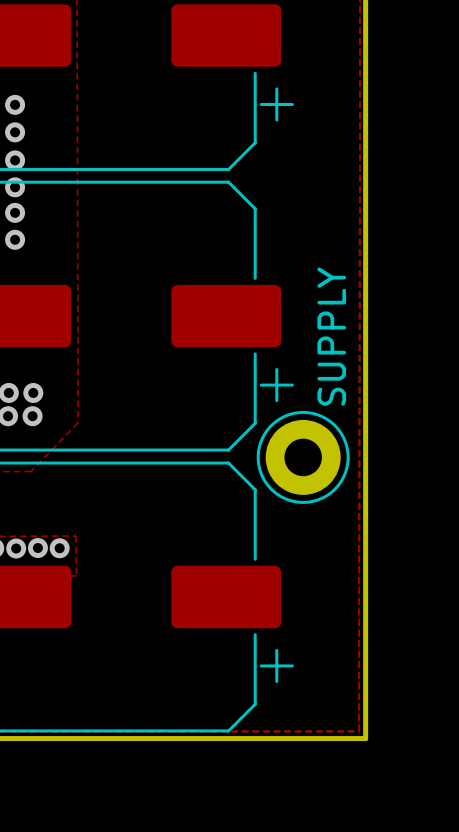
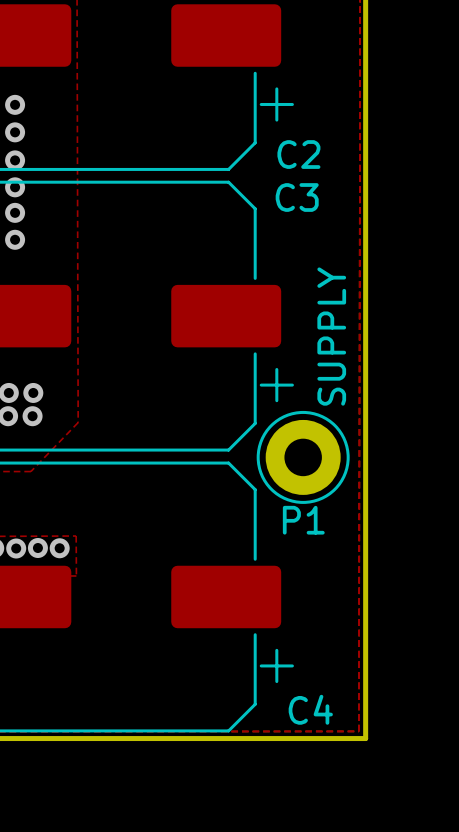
C2 name: none -> C2 (298, 154)
C3 name: none -> C3 (297, 197)
P1 name: none -> P1 (303, 520)
C4 name: none -> C4 (310, 709)

